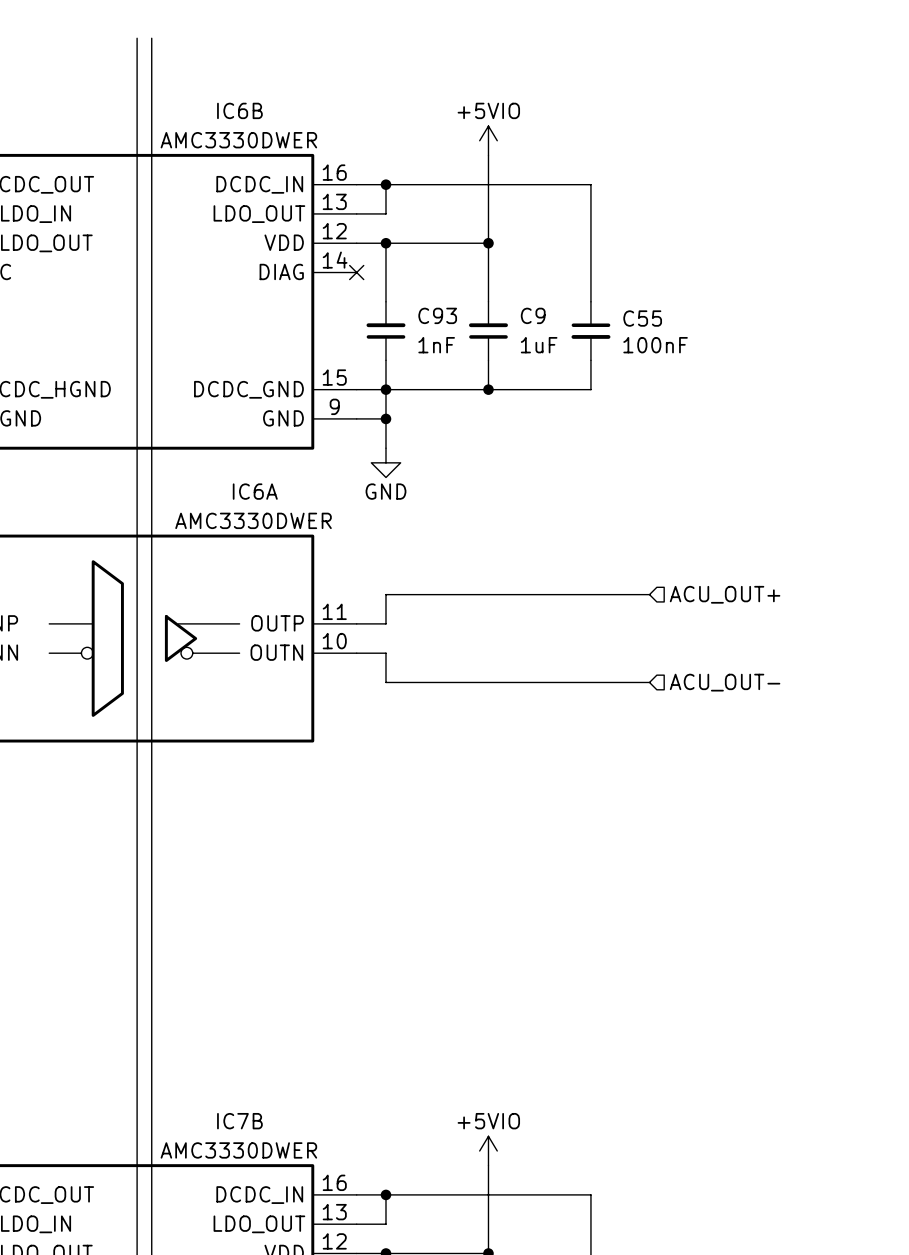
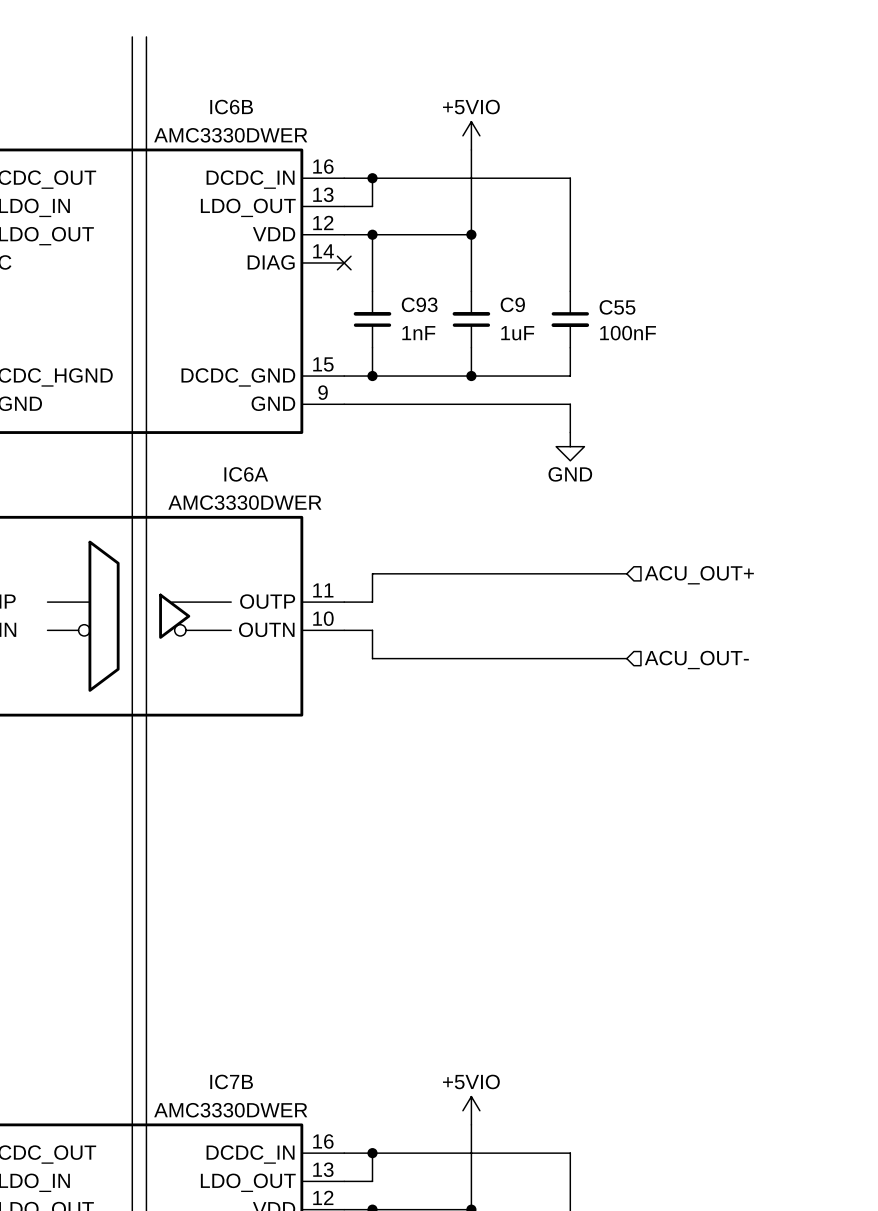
wire: (385, 389) (385, 448) -> none
wire: none -> (372, 404) (570, 404) (570, 432)
junction: (385, 418) -> none
power symbol position: GND (385, 462) -> GND (570, 446)

